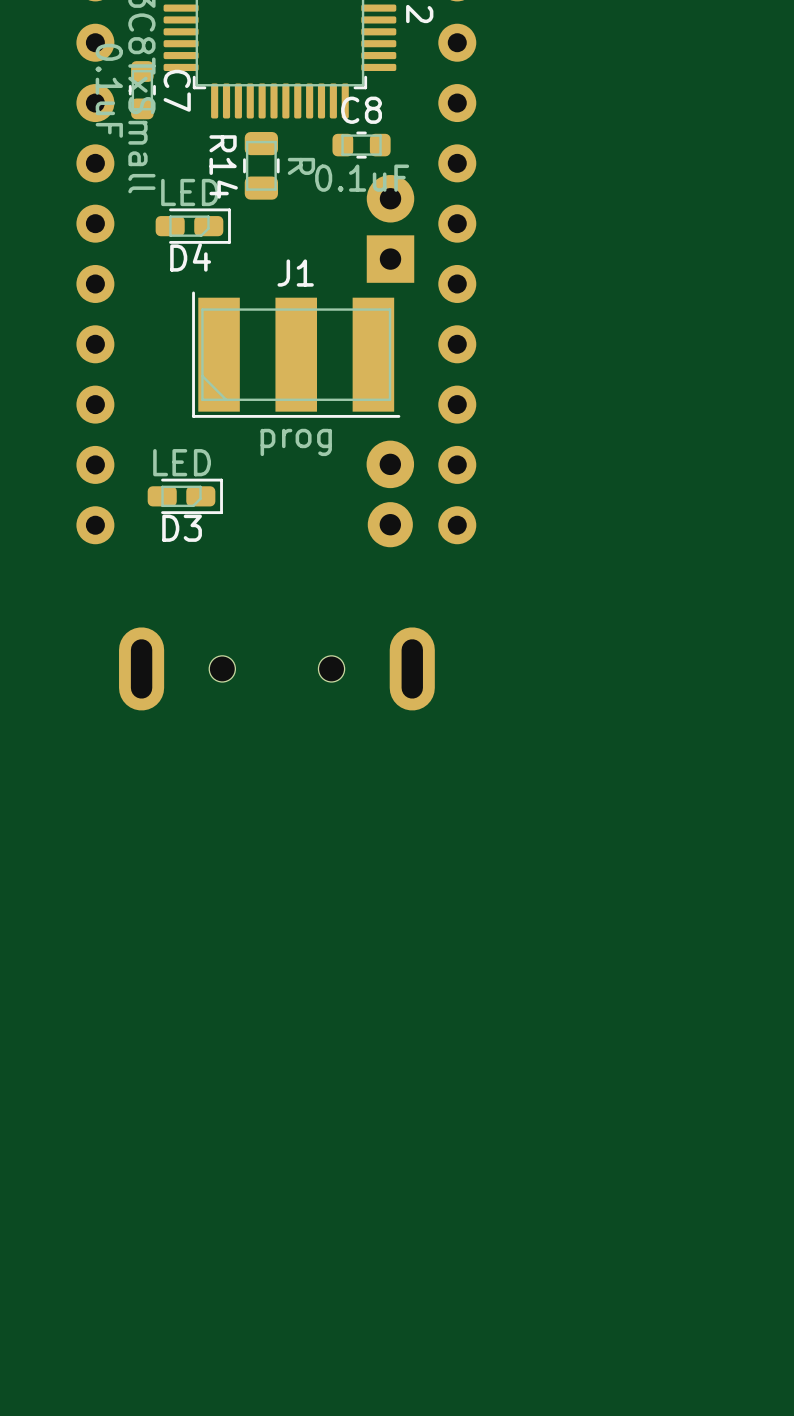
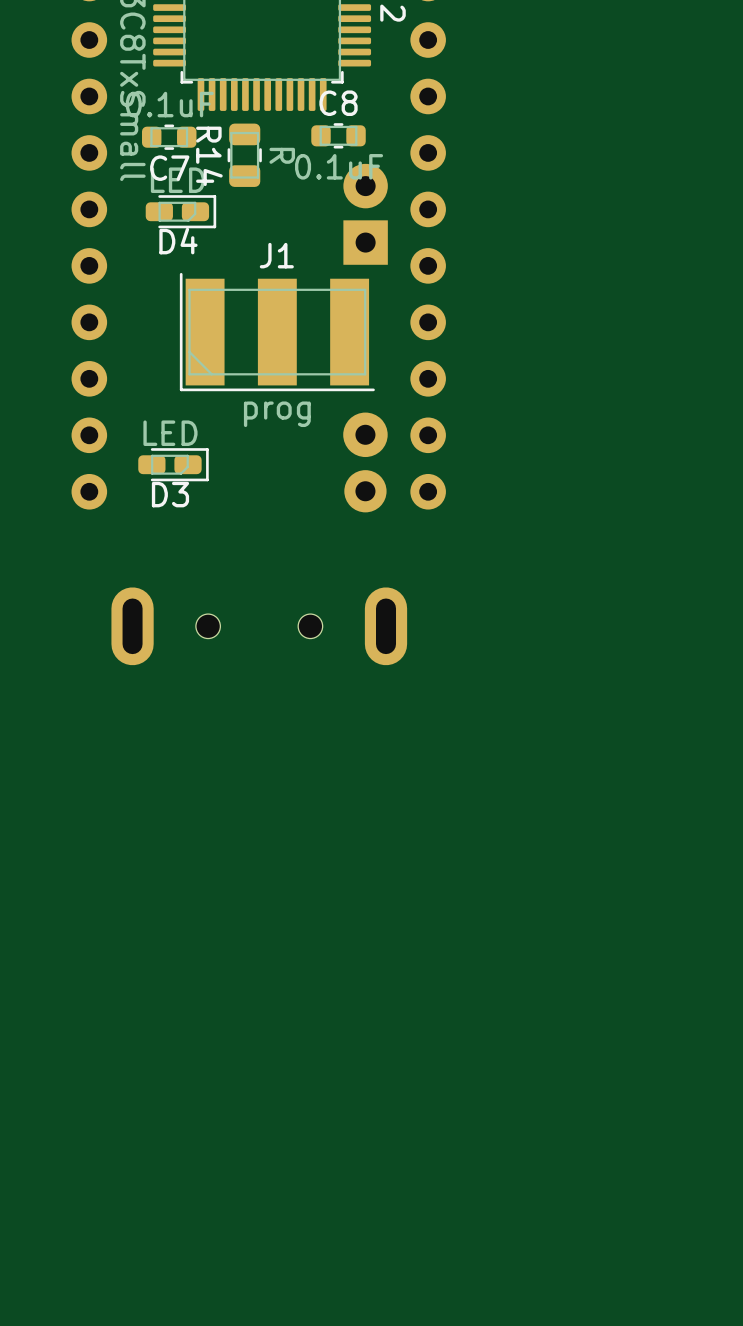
C7 rotation: 0° (142, 90) -> 90° clockwise (169, 137)
C7 position: (142, 90) -> (169, 137)

